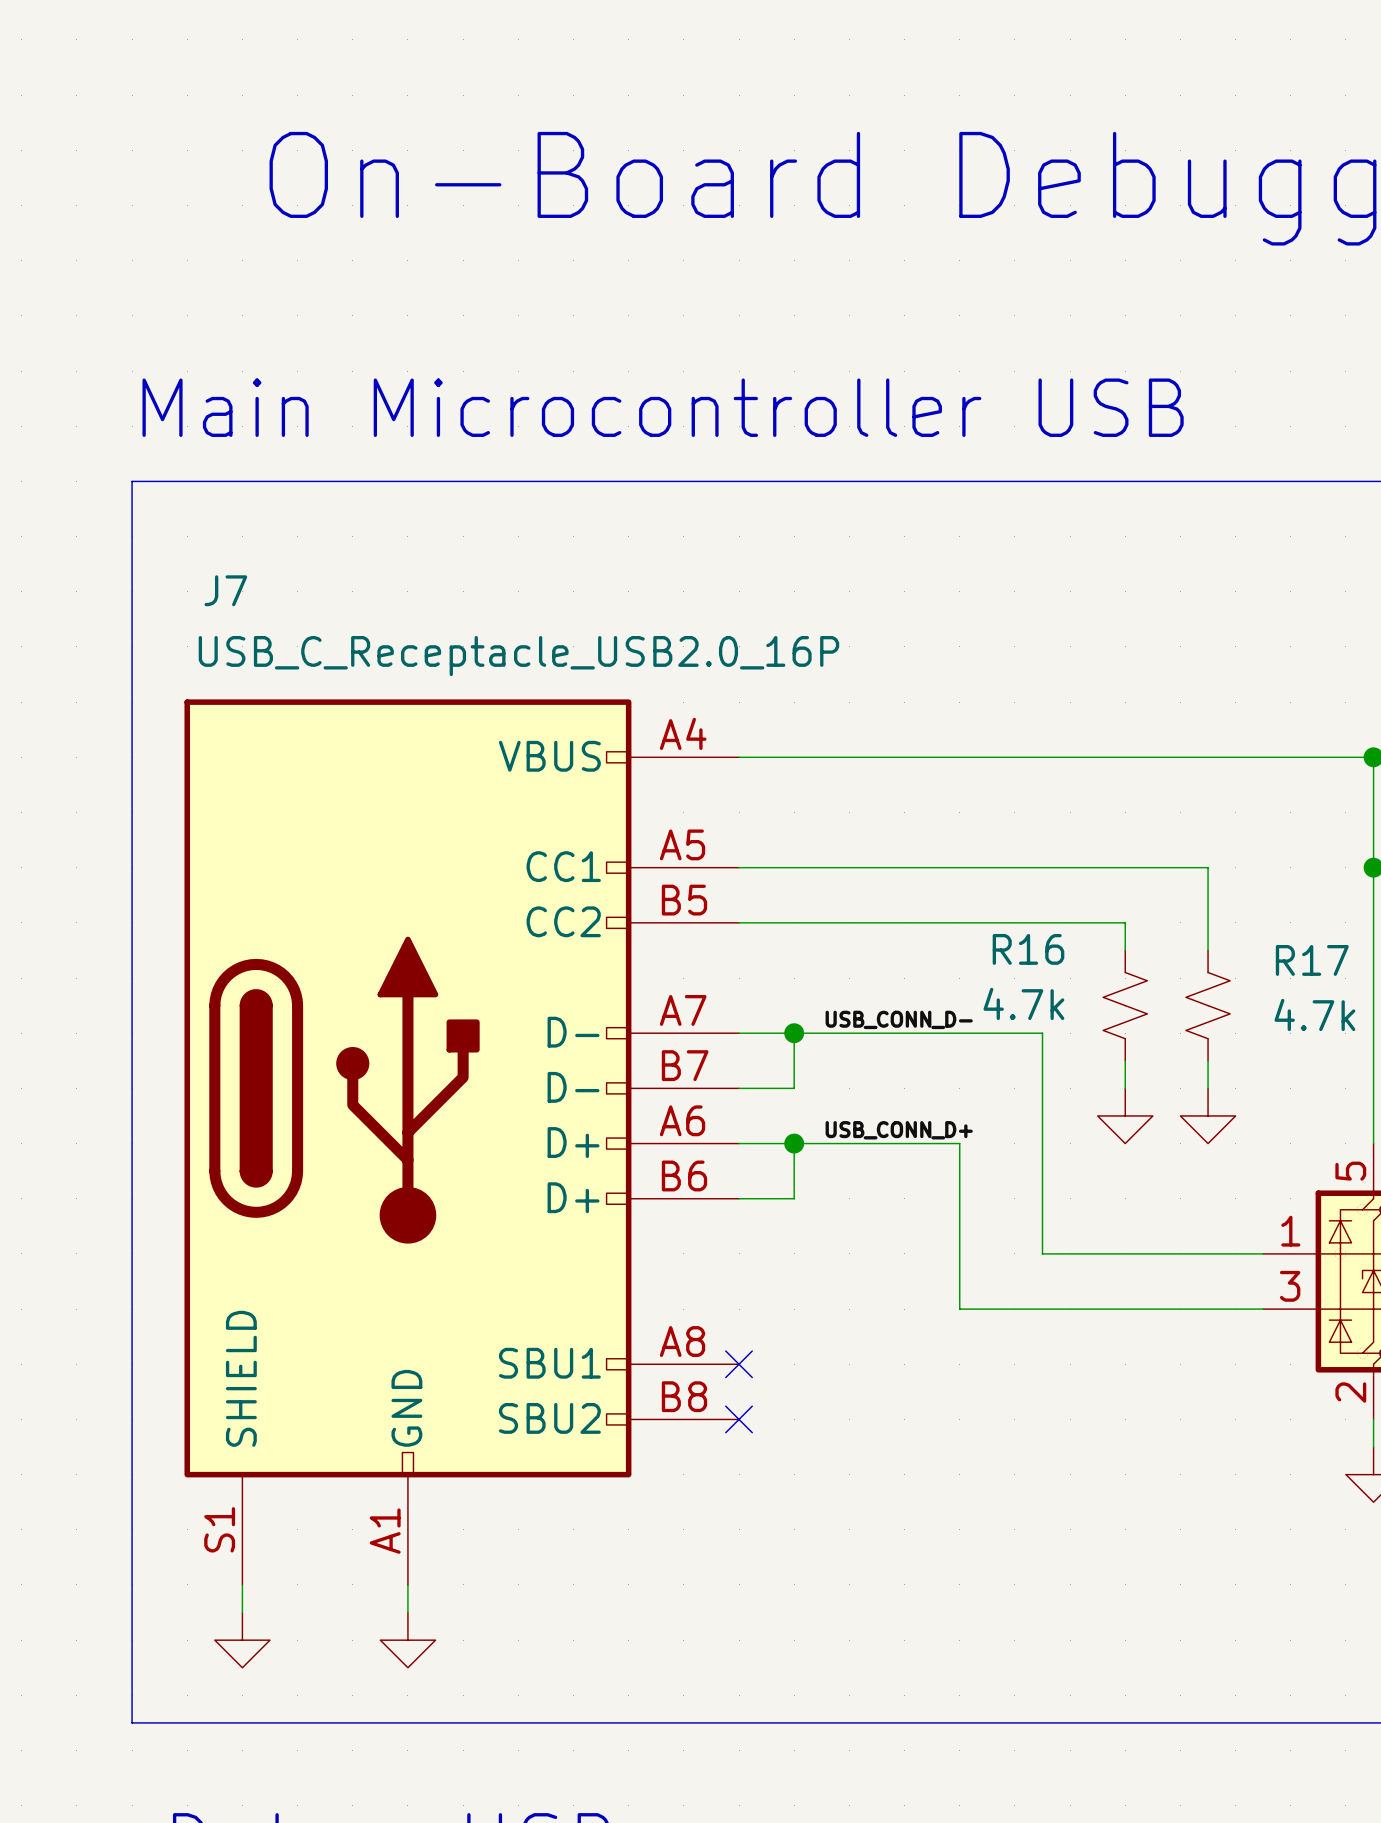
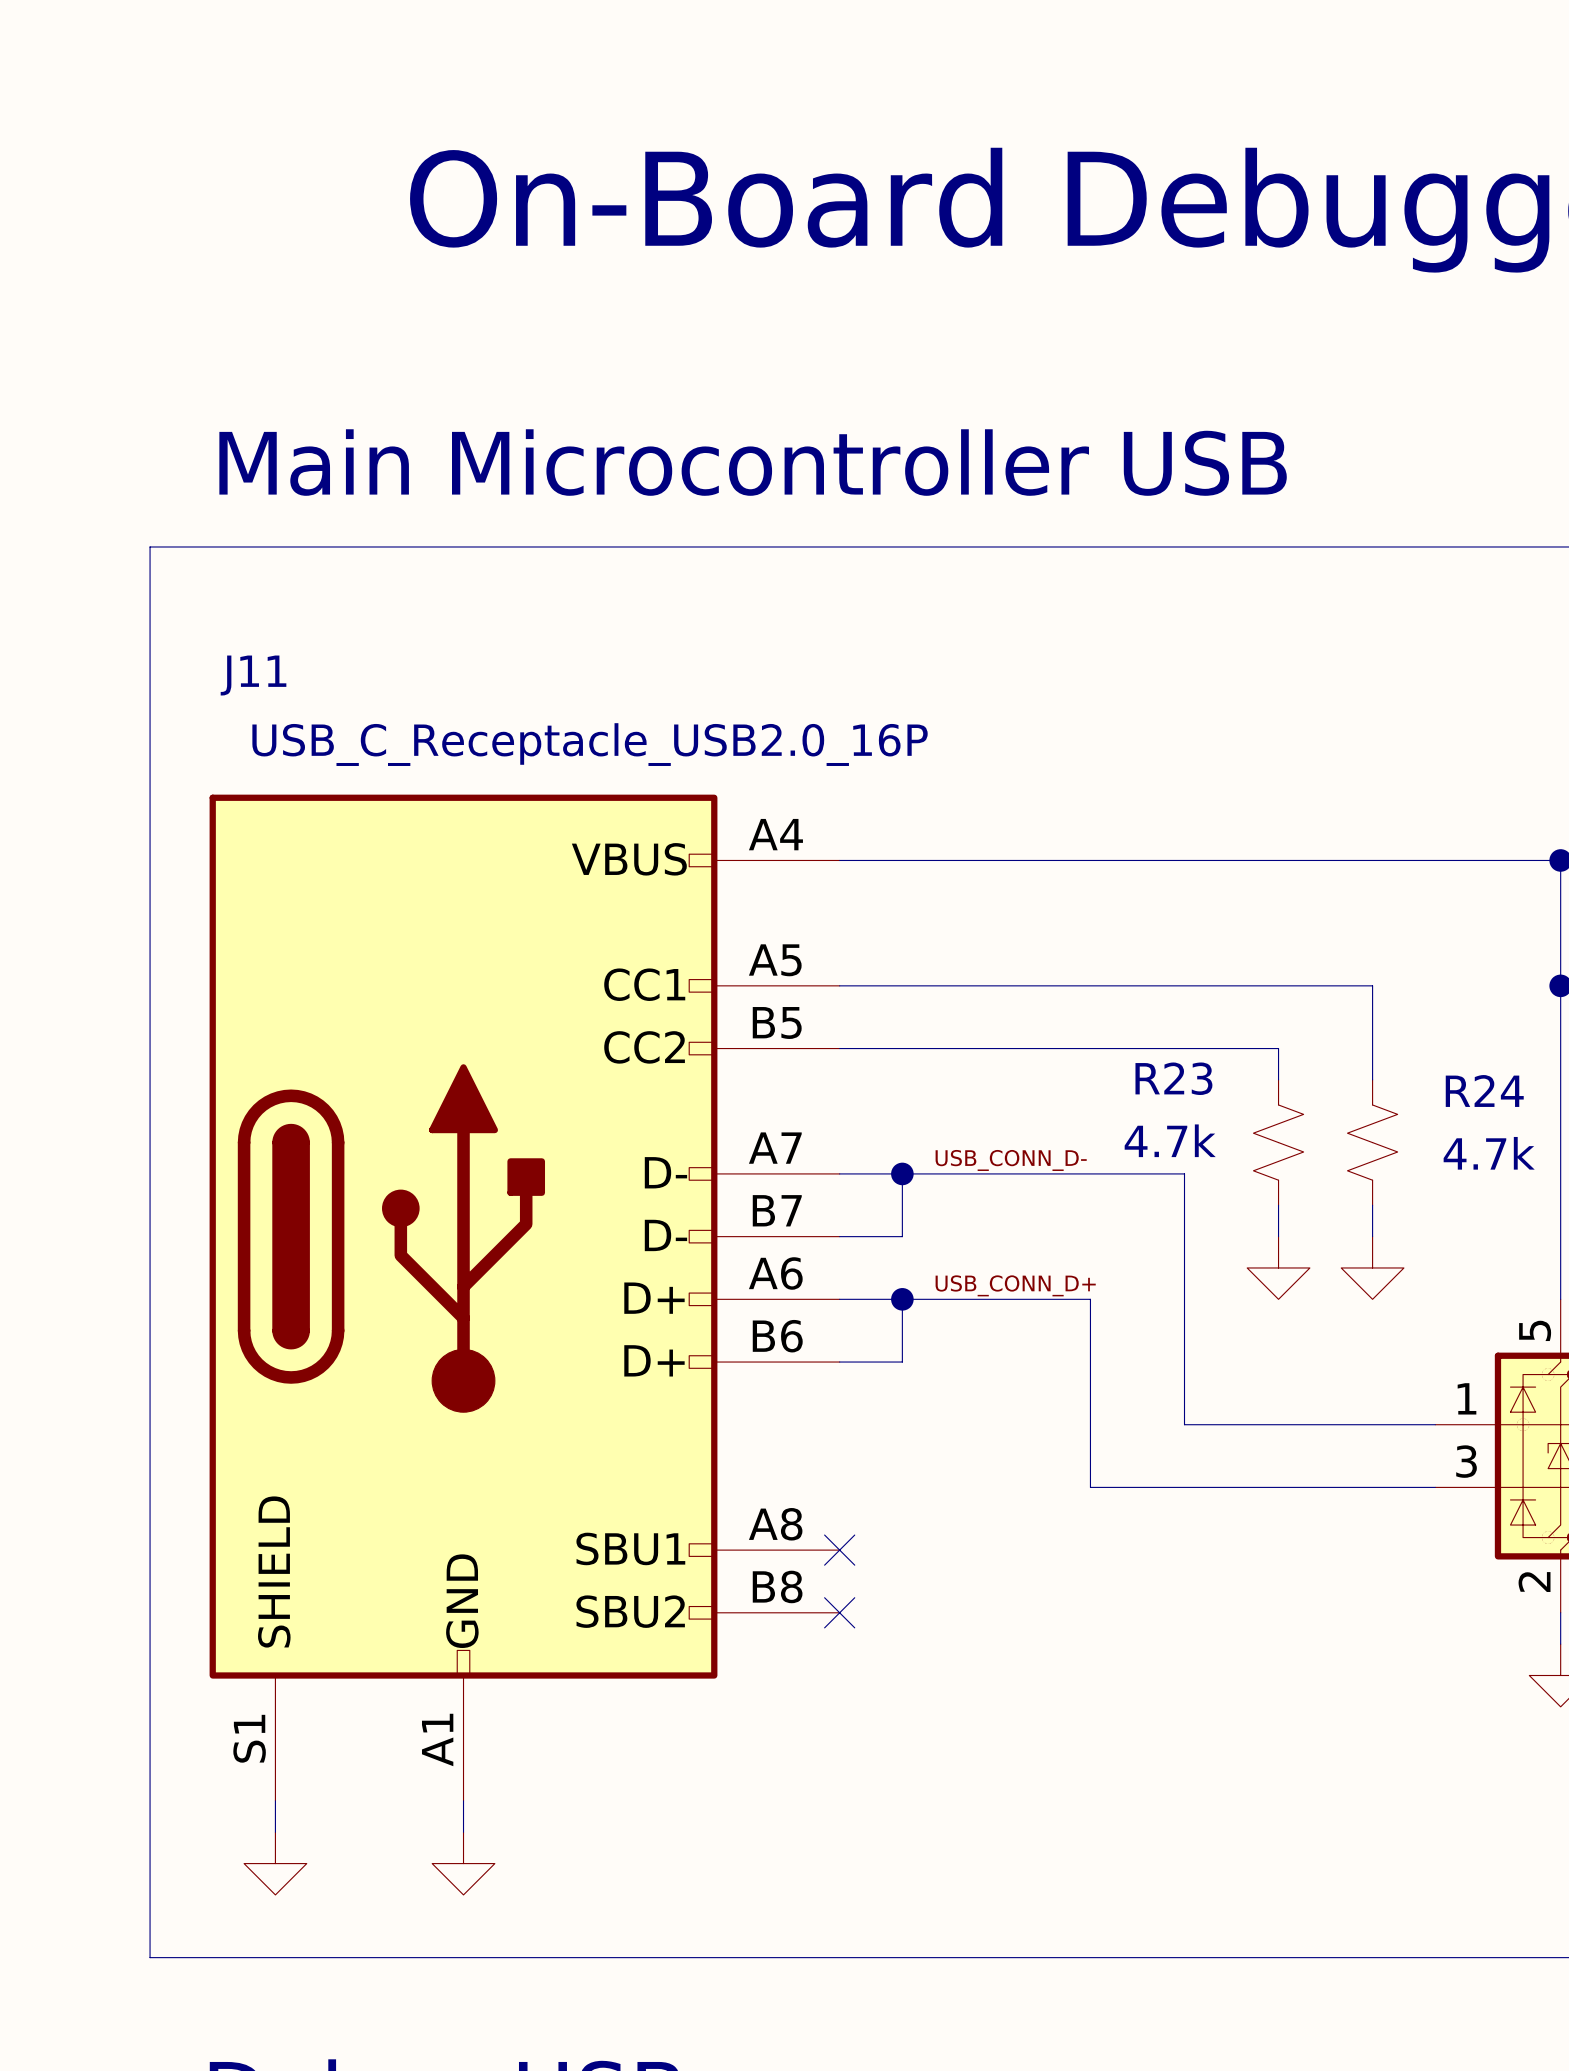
J7 name: J7 (225, 590) -> J11 (253, 675)
R16 name: R16 (1028, 949) -> R23 (1173, 1078)
R17 name: R17 (1312, 960) -> R24 (1484, 1090)

